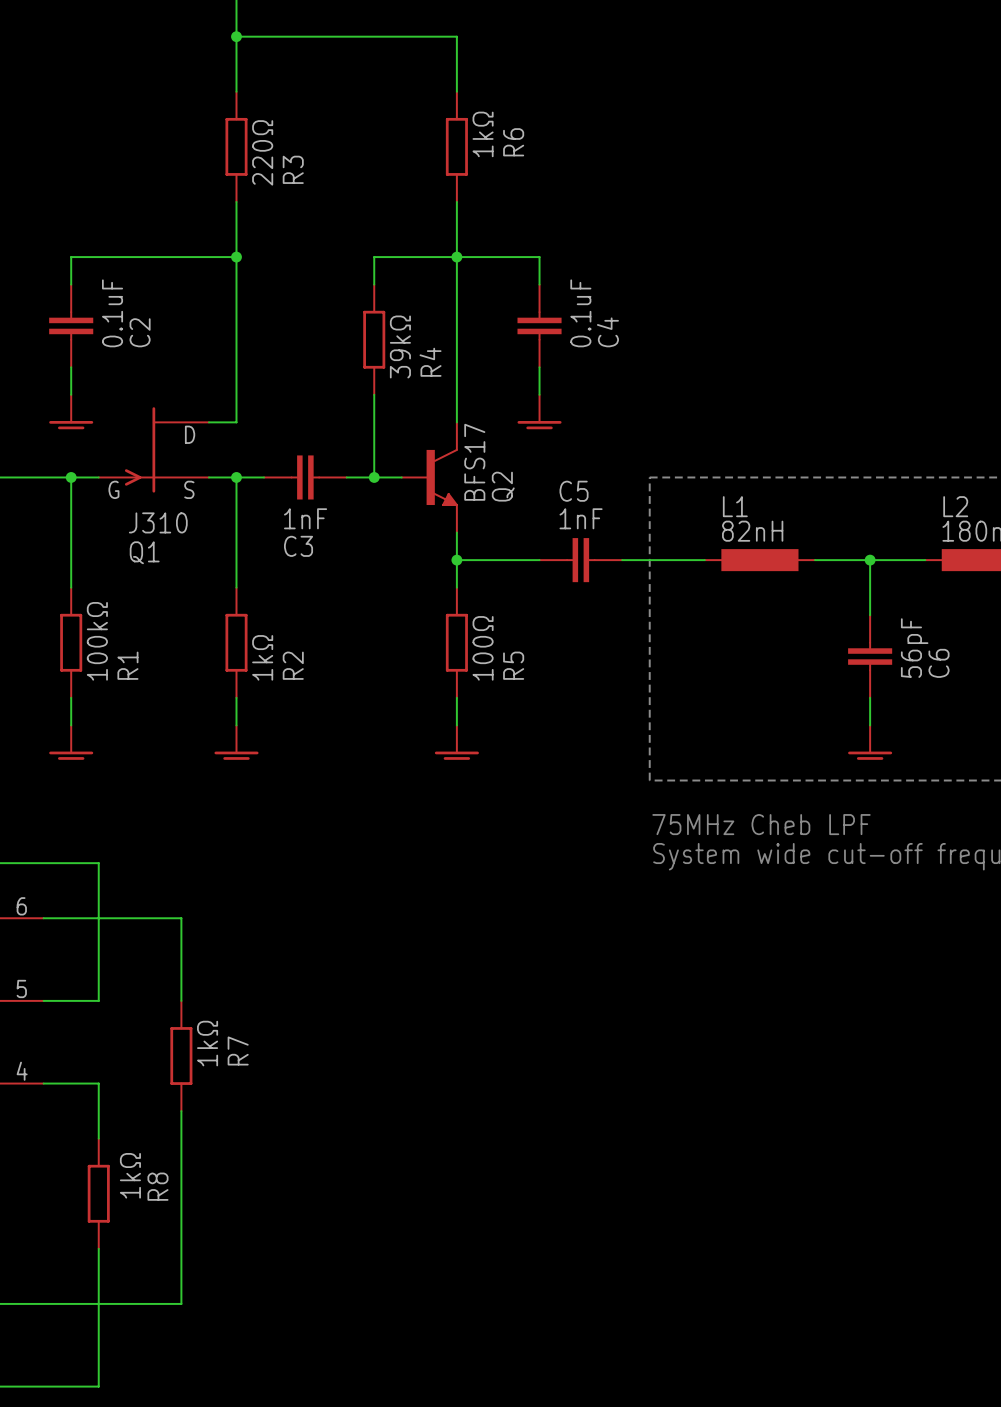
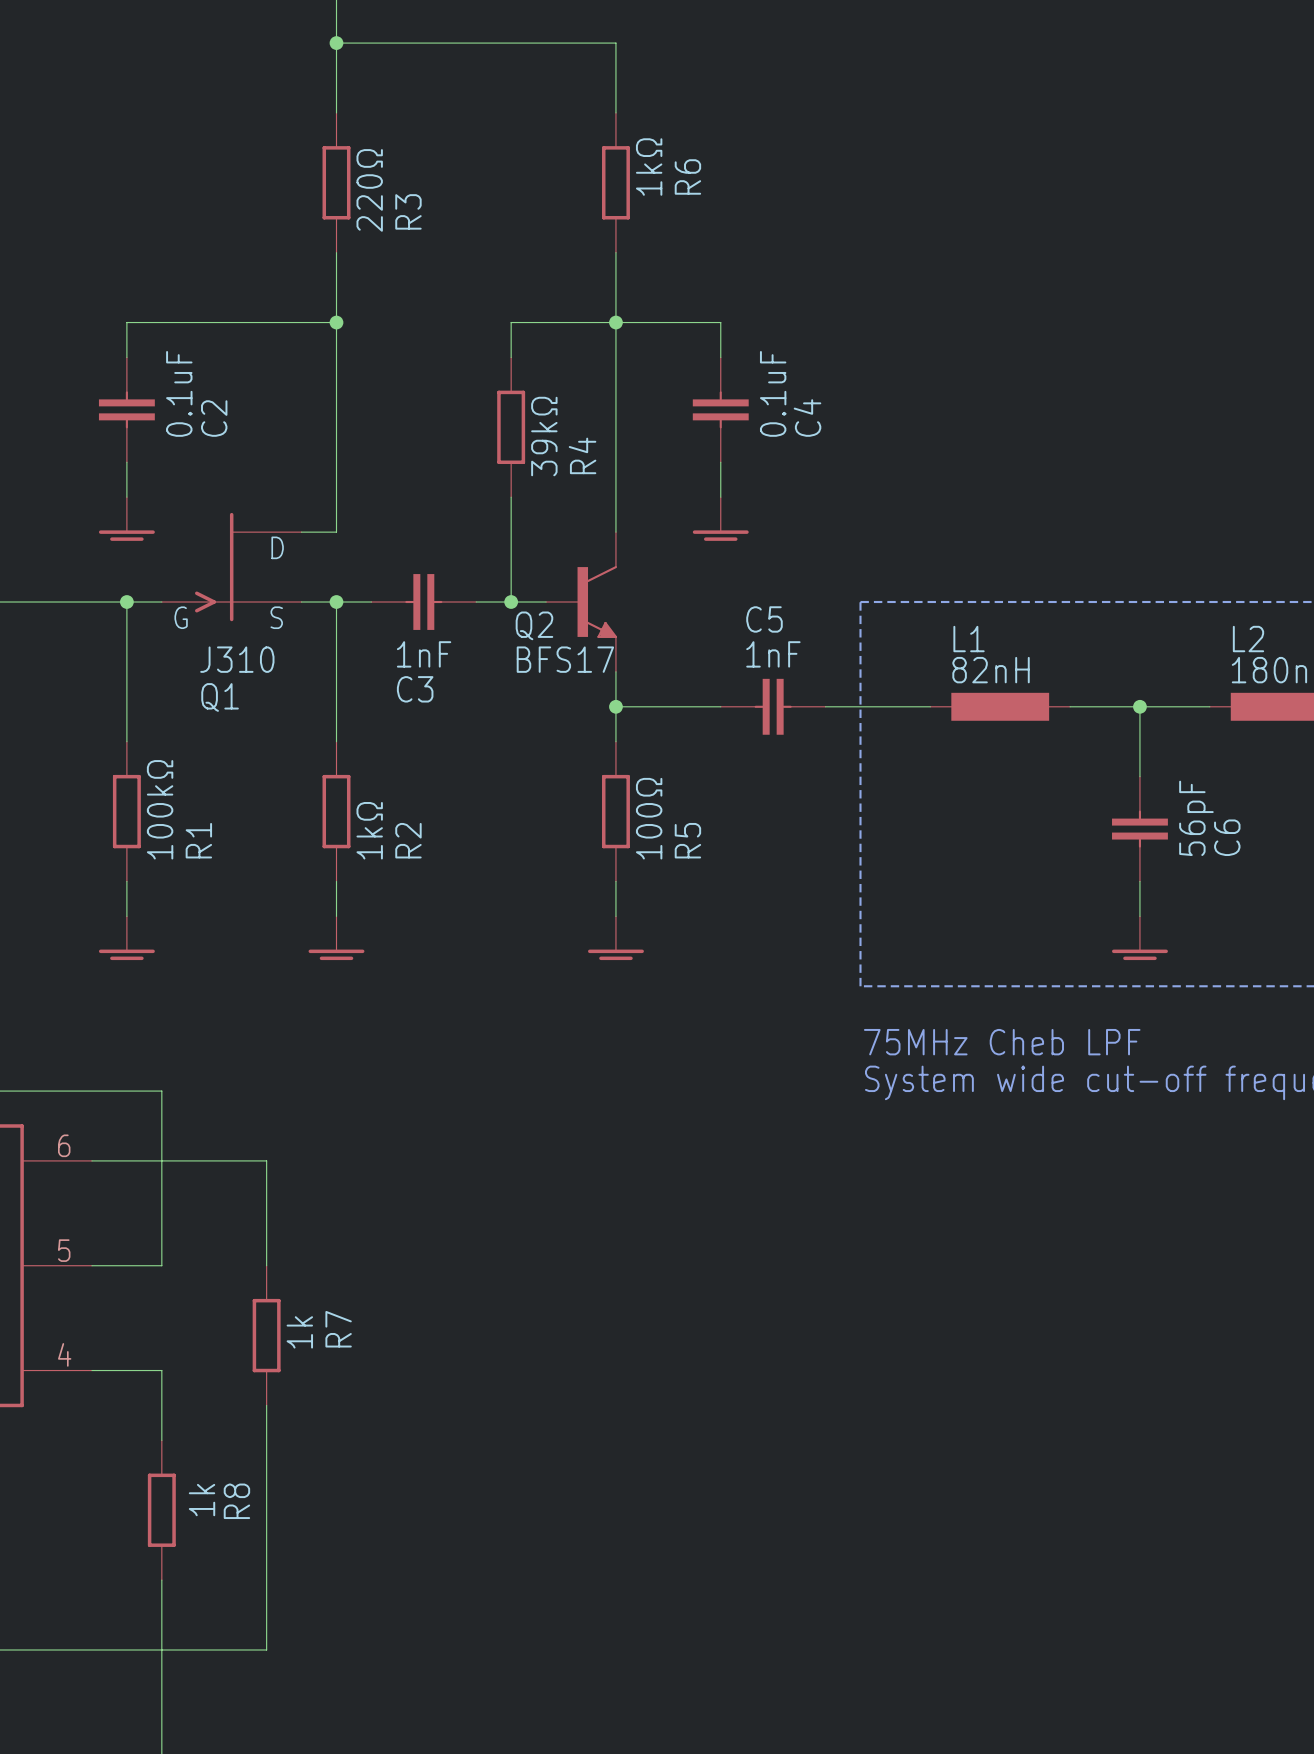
Q2 value rotation: 0° (474, 462) -> 90° clockwise (565, 659)
Q2 name rotation: 0° (503, 486) -> 90° clockwise (534, 625)
Q2 name position: Q2 (503, 486) -> Q2 (534, 625)
R7 value: 1kΩ (207, 1043) -> 1k (299, 1332)
R8 value: 1kΩ (130, 1175) -> 1k (202, 1500)

